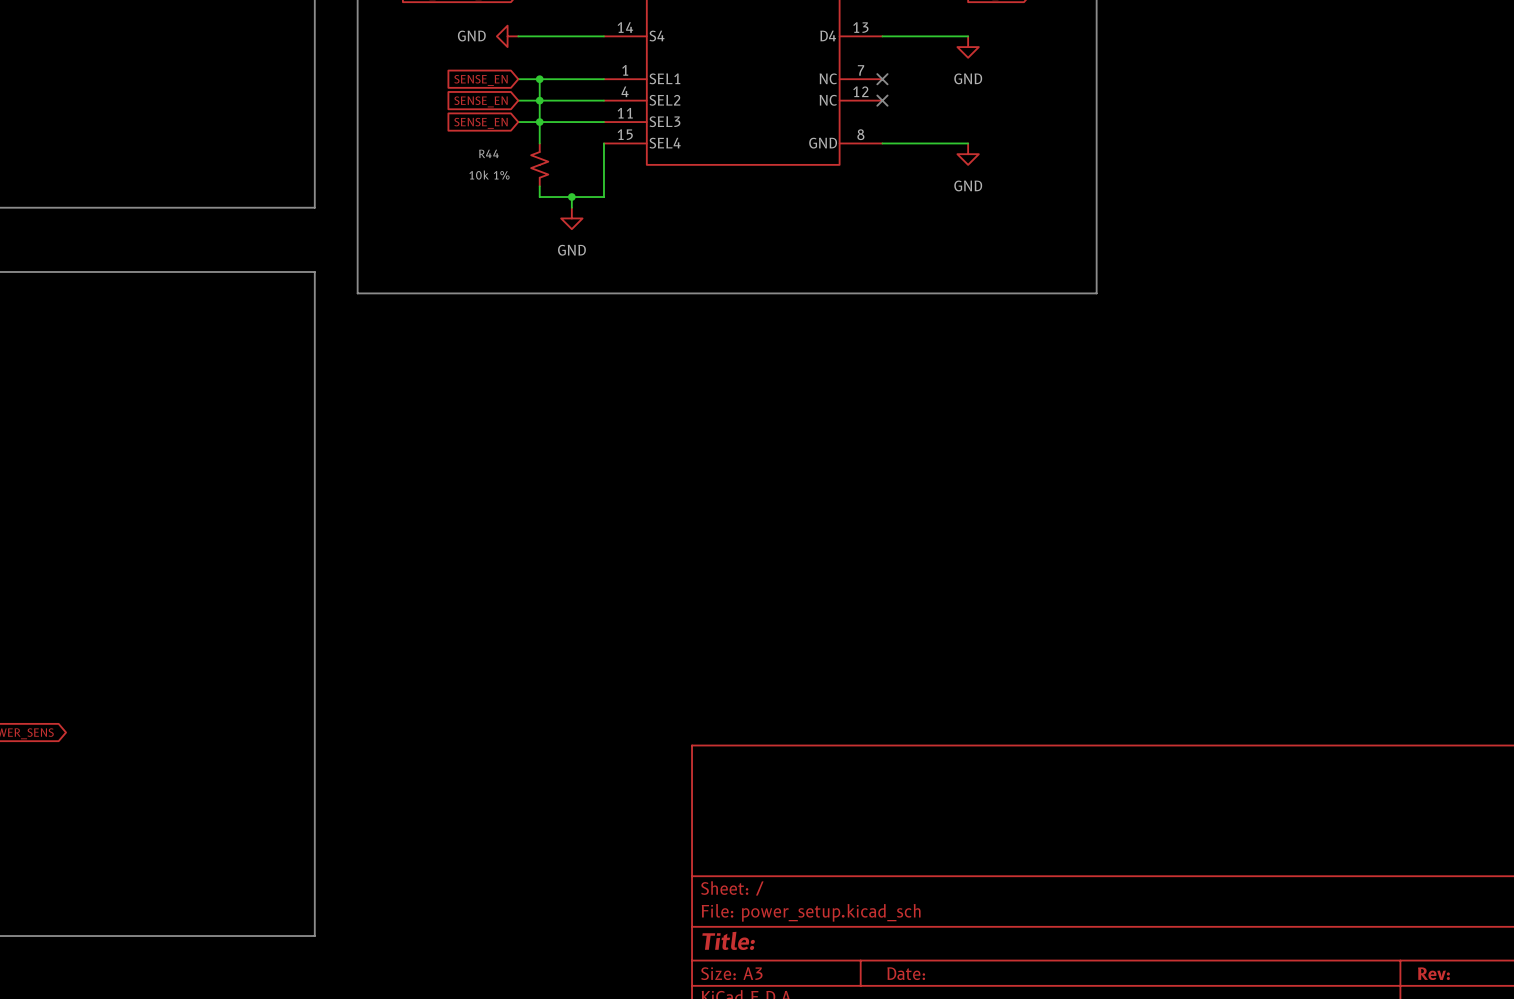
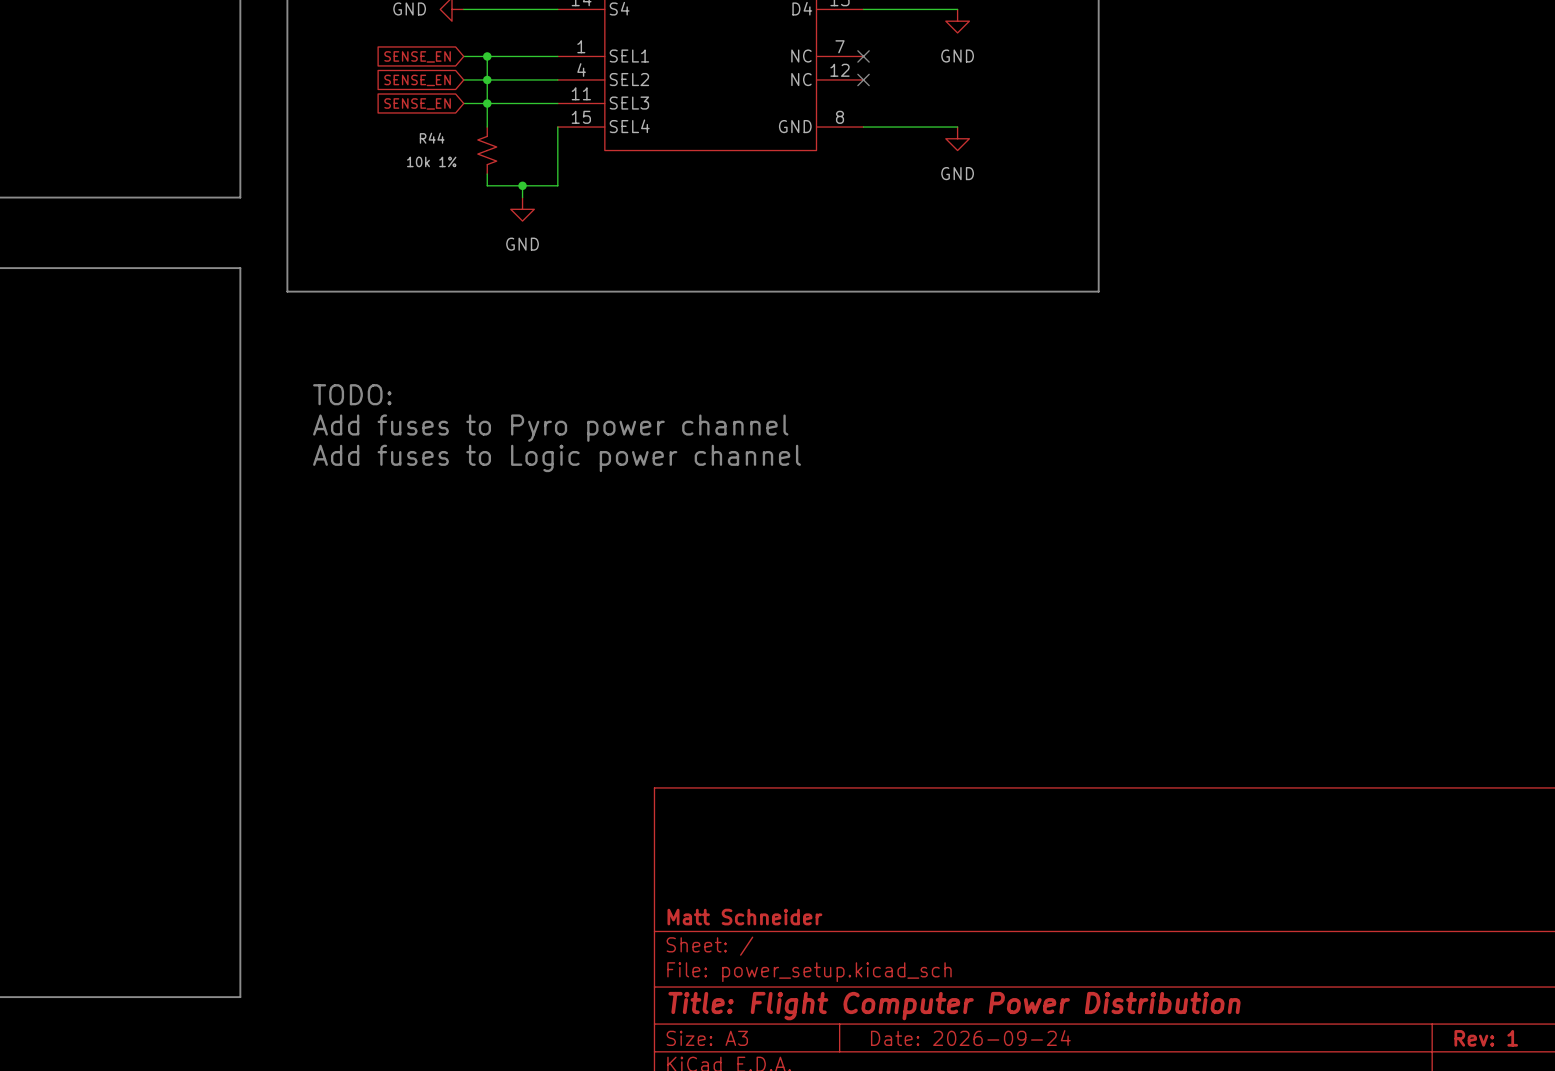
text: none -> TODO: (352, 394)
text: none -> Add fuses to Pyro power channel (550, 428)
text: none -> Add fuses to Logic power channel (557, 458)
title block: none -> Matt Schneider (744, 917)
title block: Title: (728, 940) -> Title: Flight Computer Power Distribution (954, 1006)
title block: Date: (906, 973) -> Date: 2026-09-24 (970, 1038)
title block: Rev: (1433, 973) -> Rev: 1 (1486, 1038)

